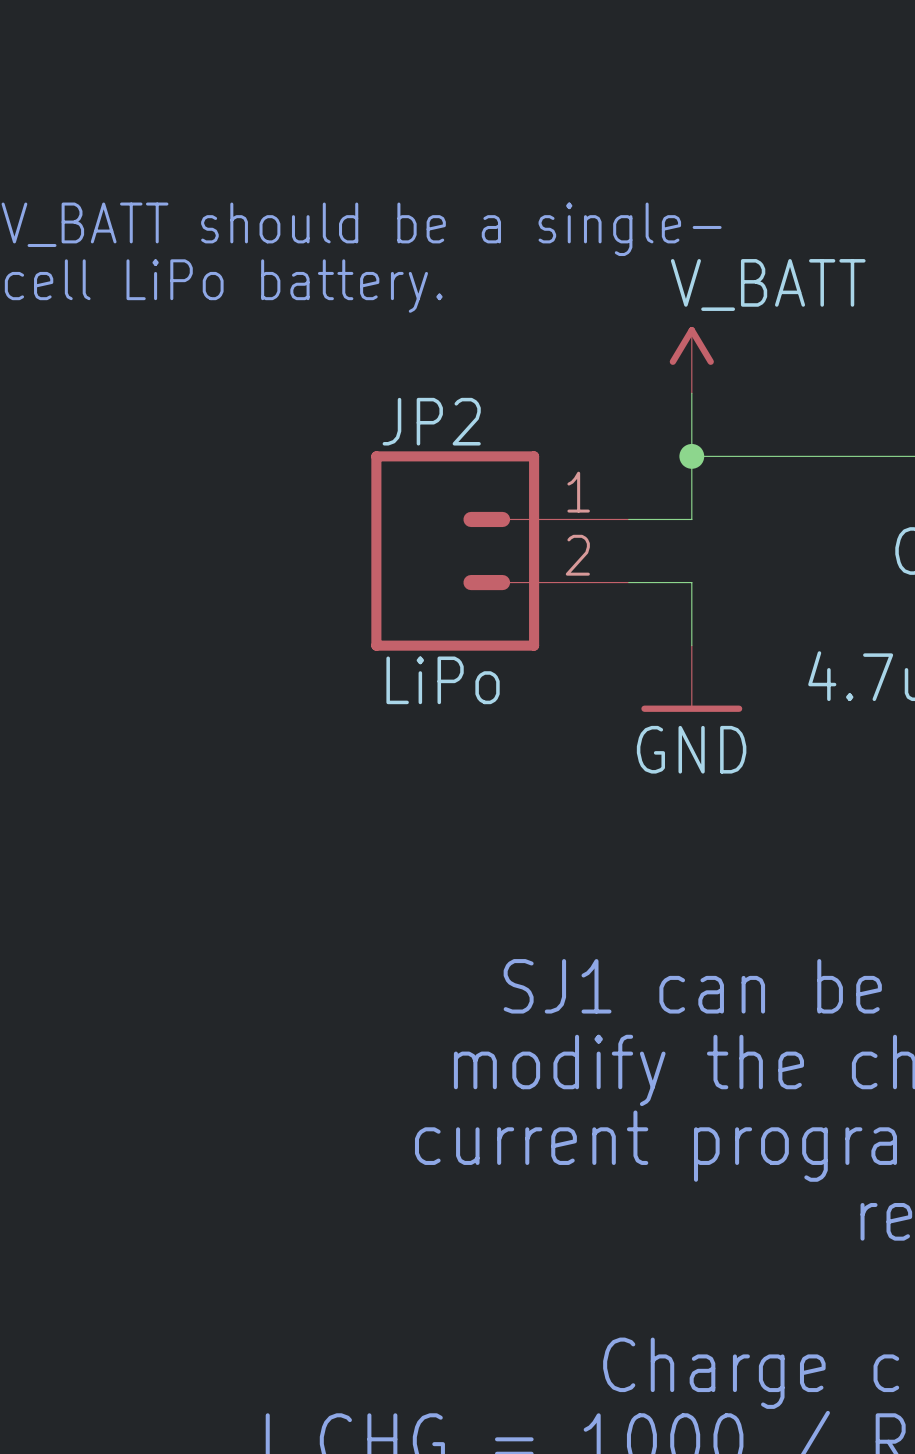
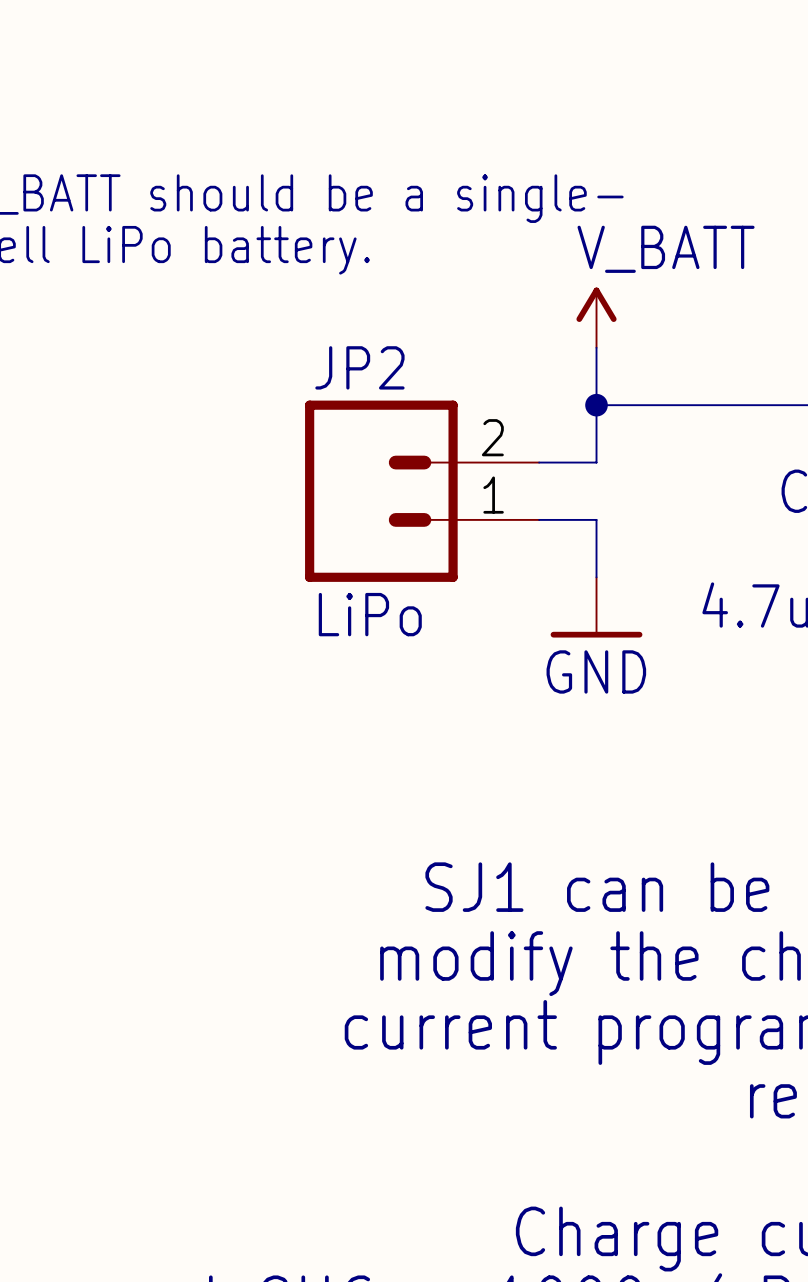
JP2 flip: as is (455, 551) -> up-down (381, 491)

